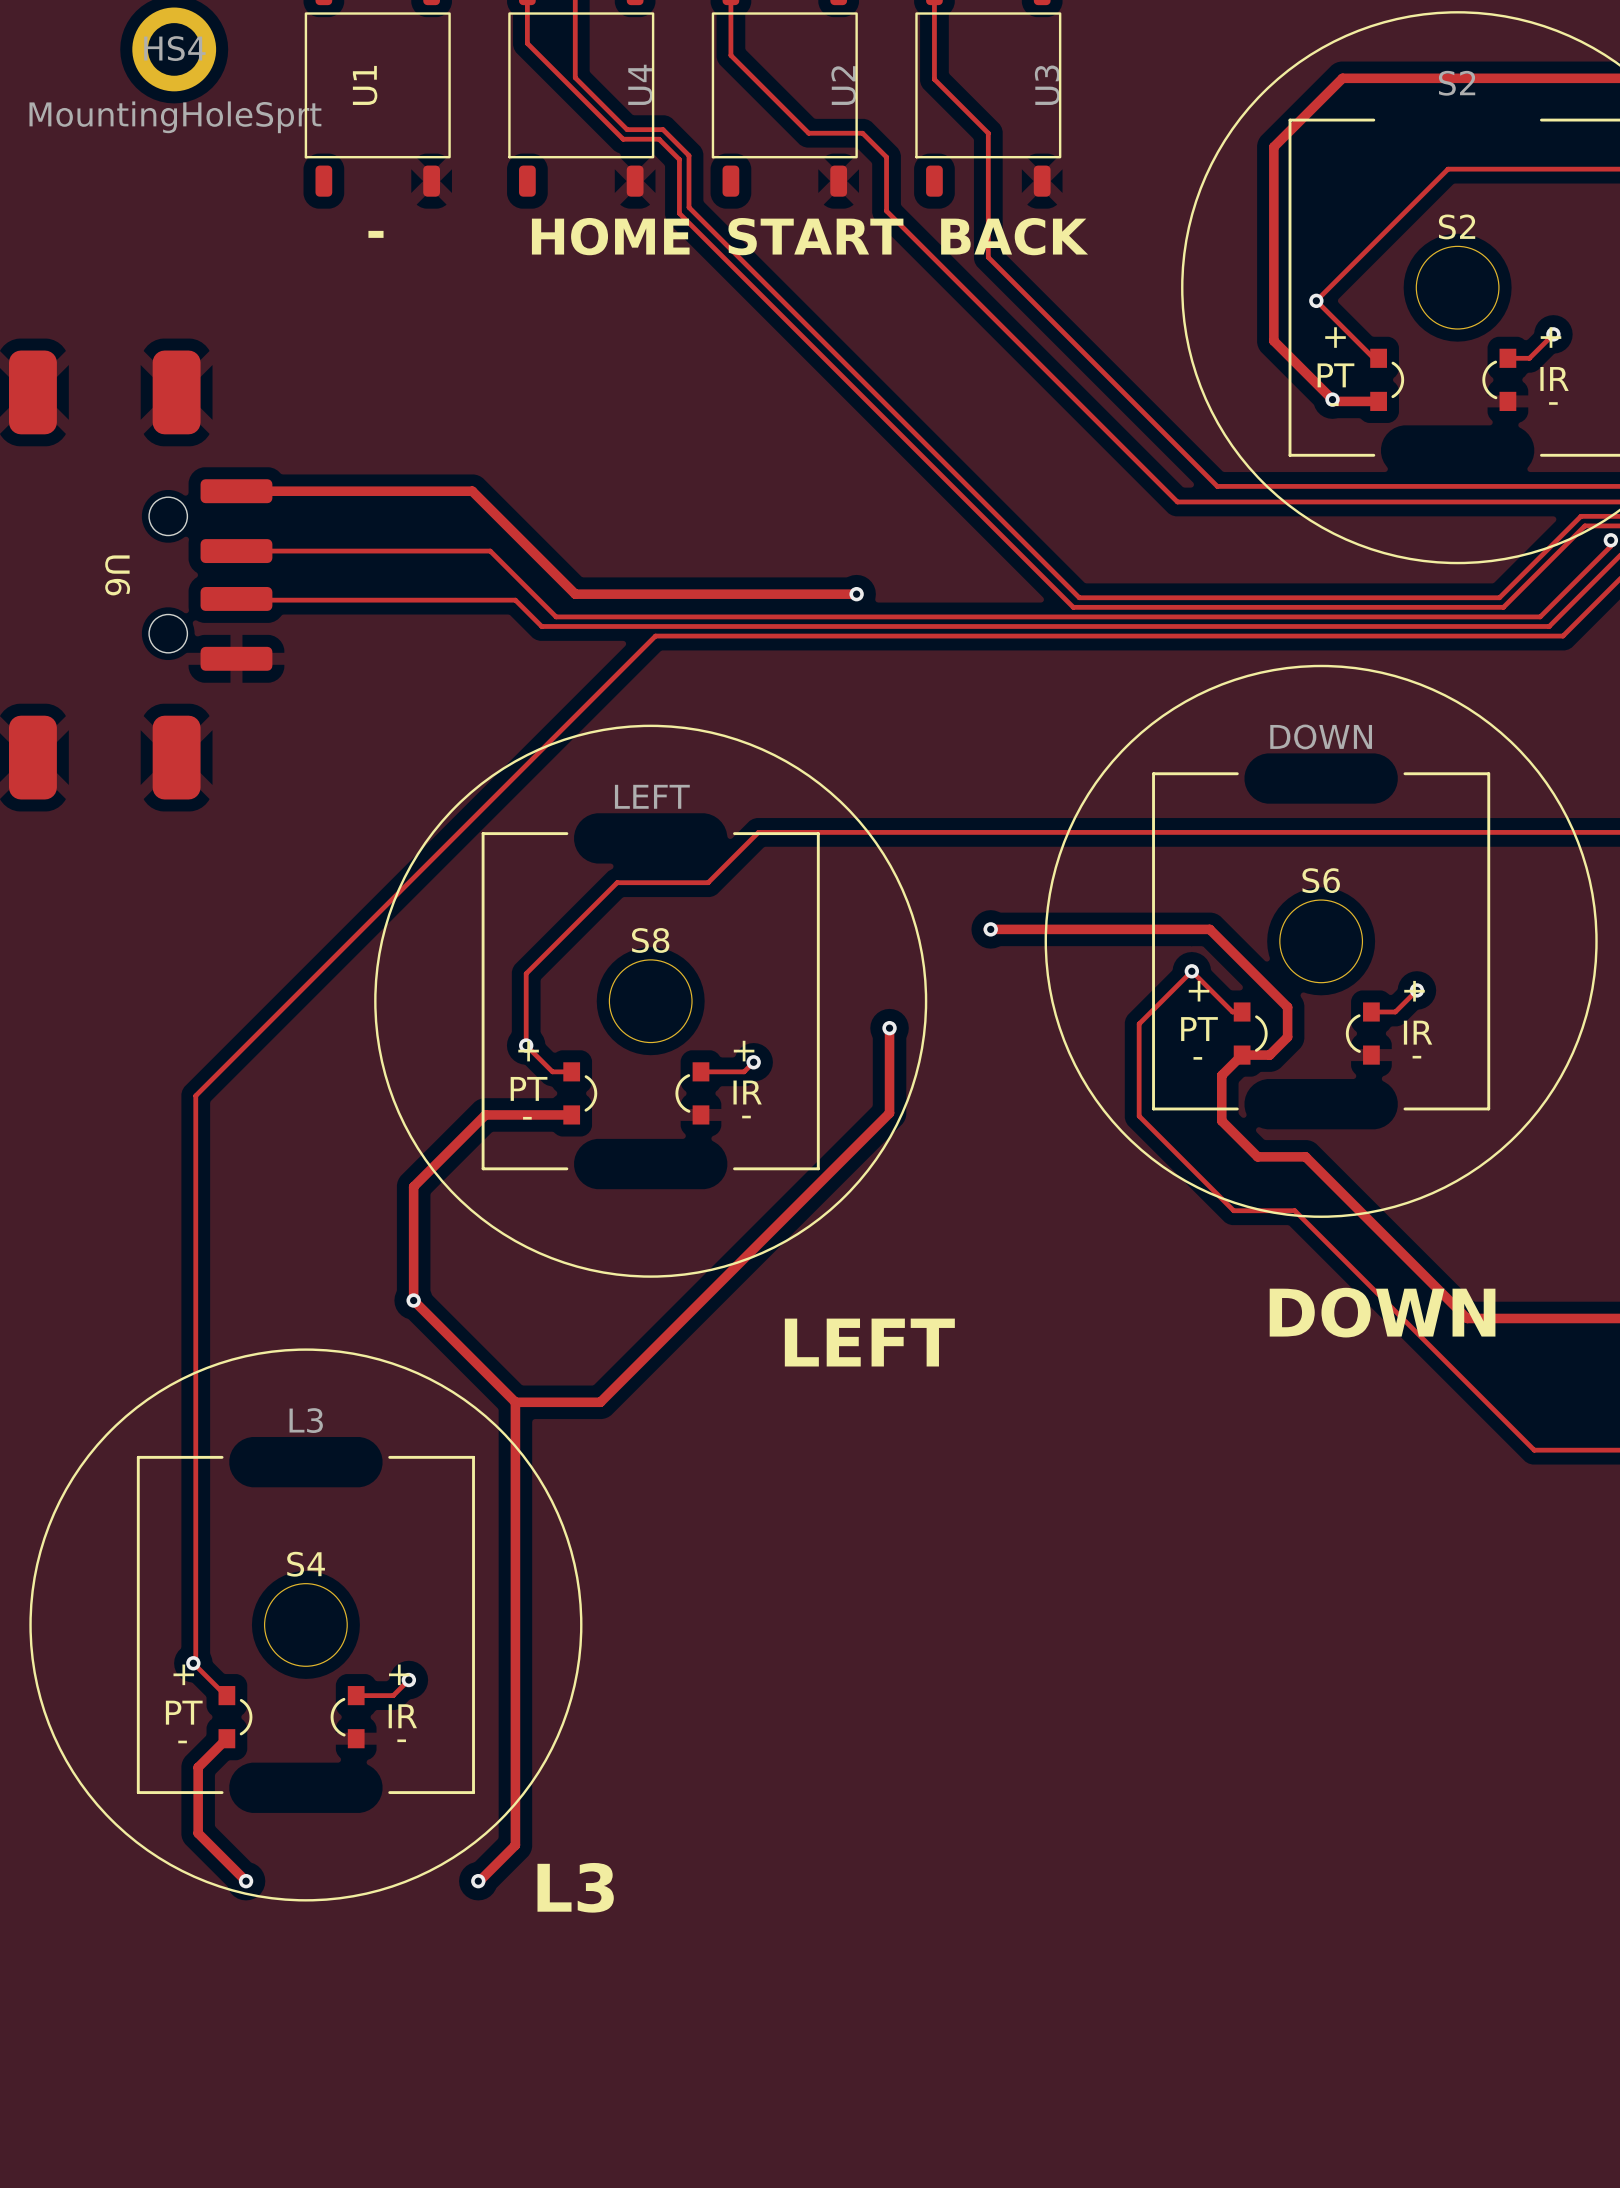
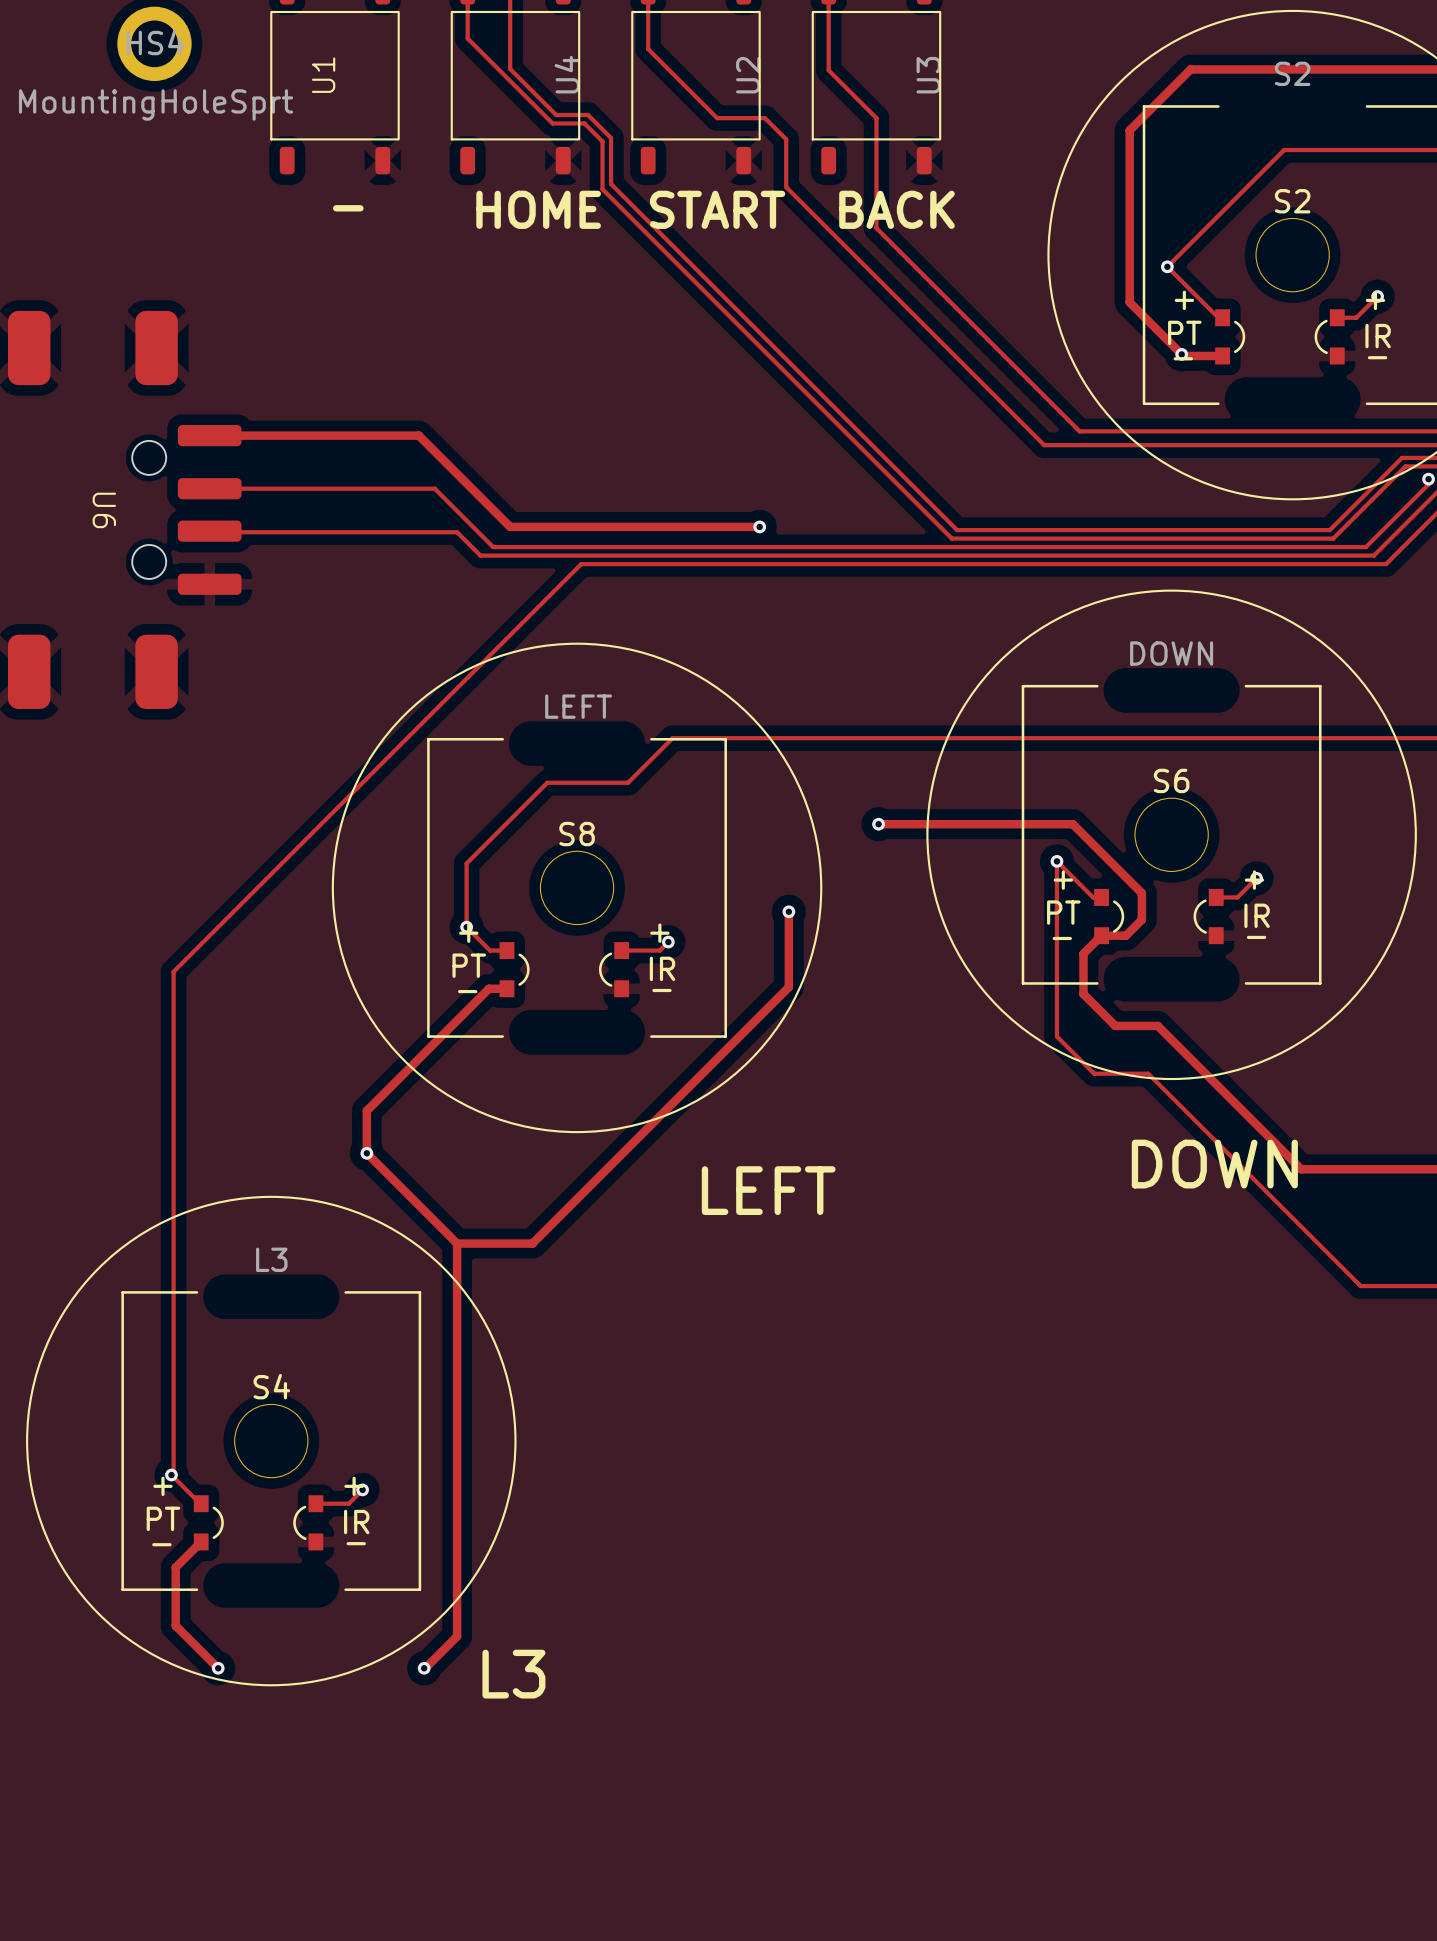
track: (1191, 971) (1139, 1023) (1139, 1116) (1191, 1168) -> (1056, 861) (1056, 1036)
track: (551, 1114) (485, 1114) (413, 1186) (413, 1252) -> (488, 988) (366, 1110)

